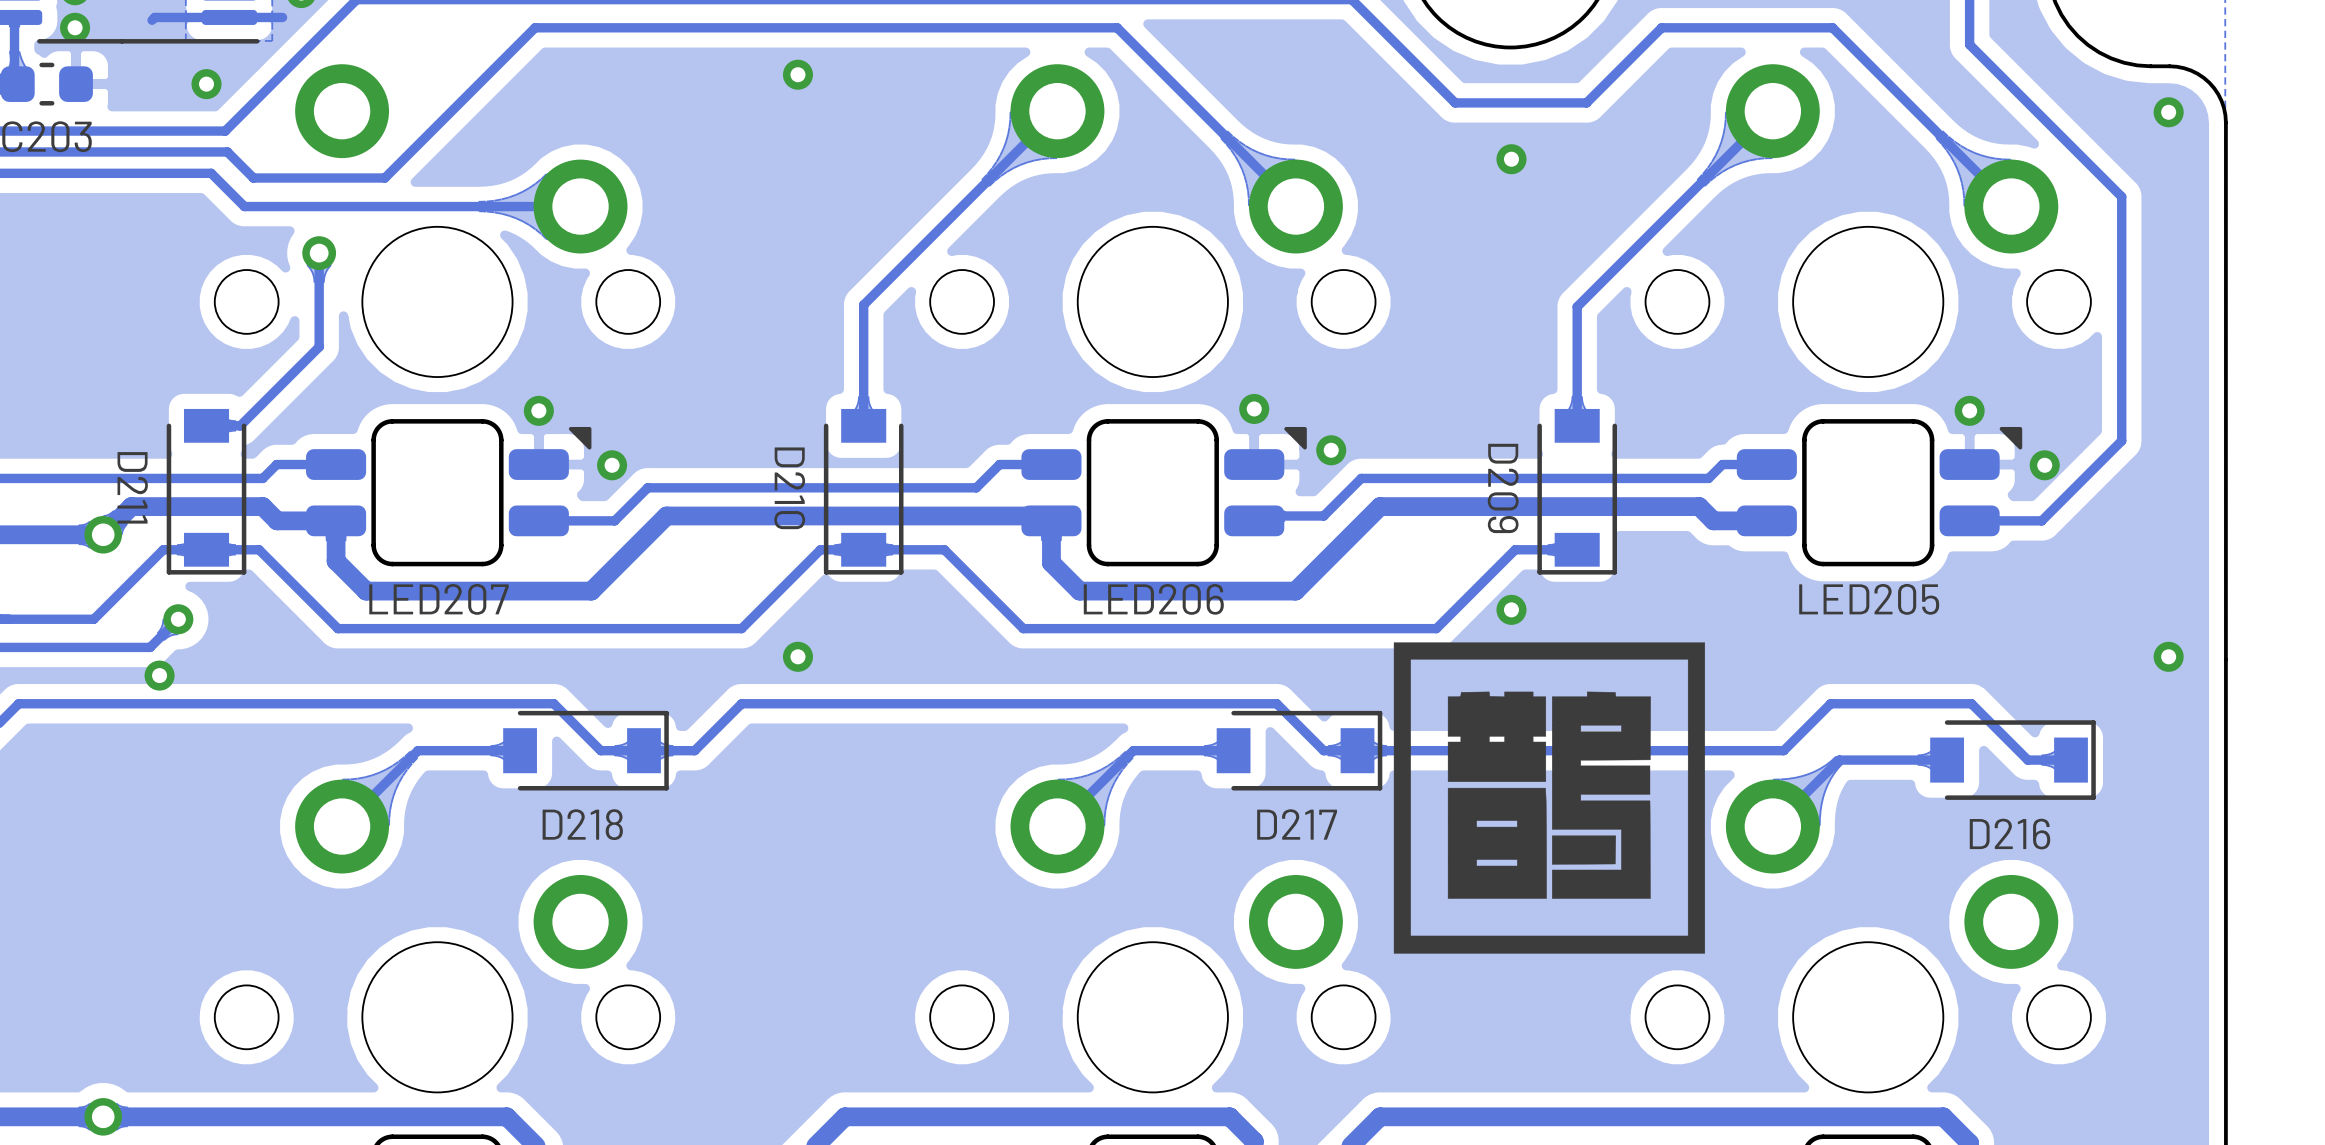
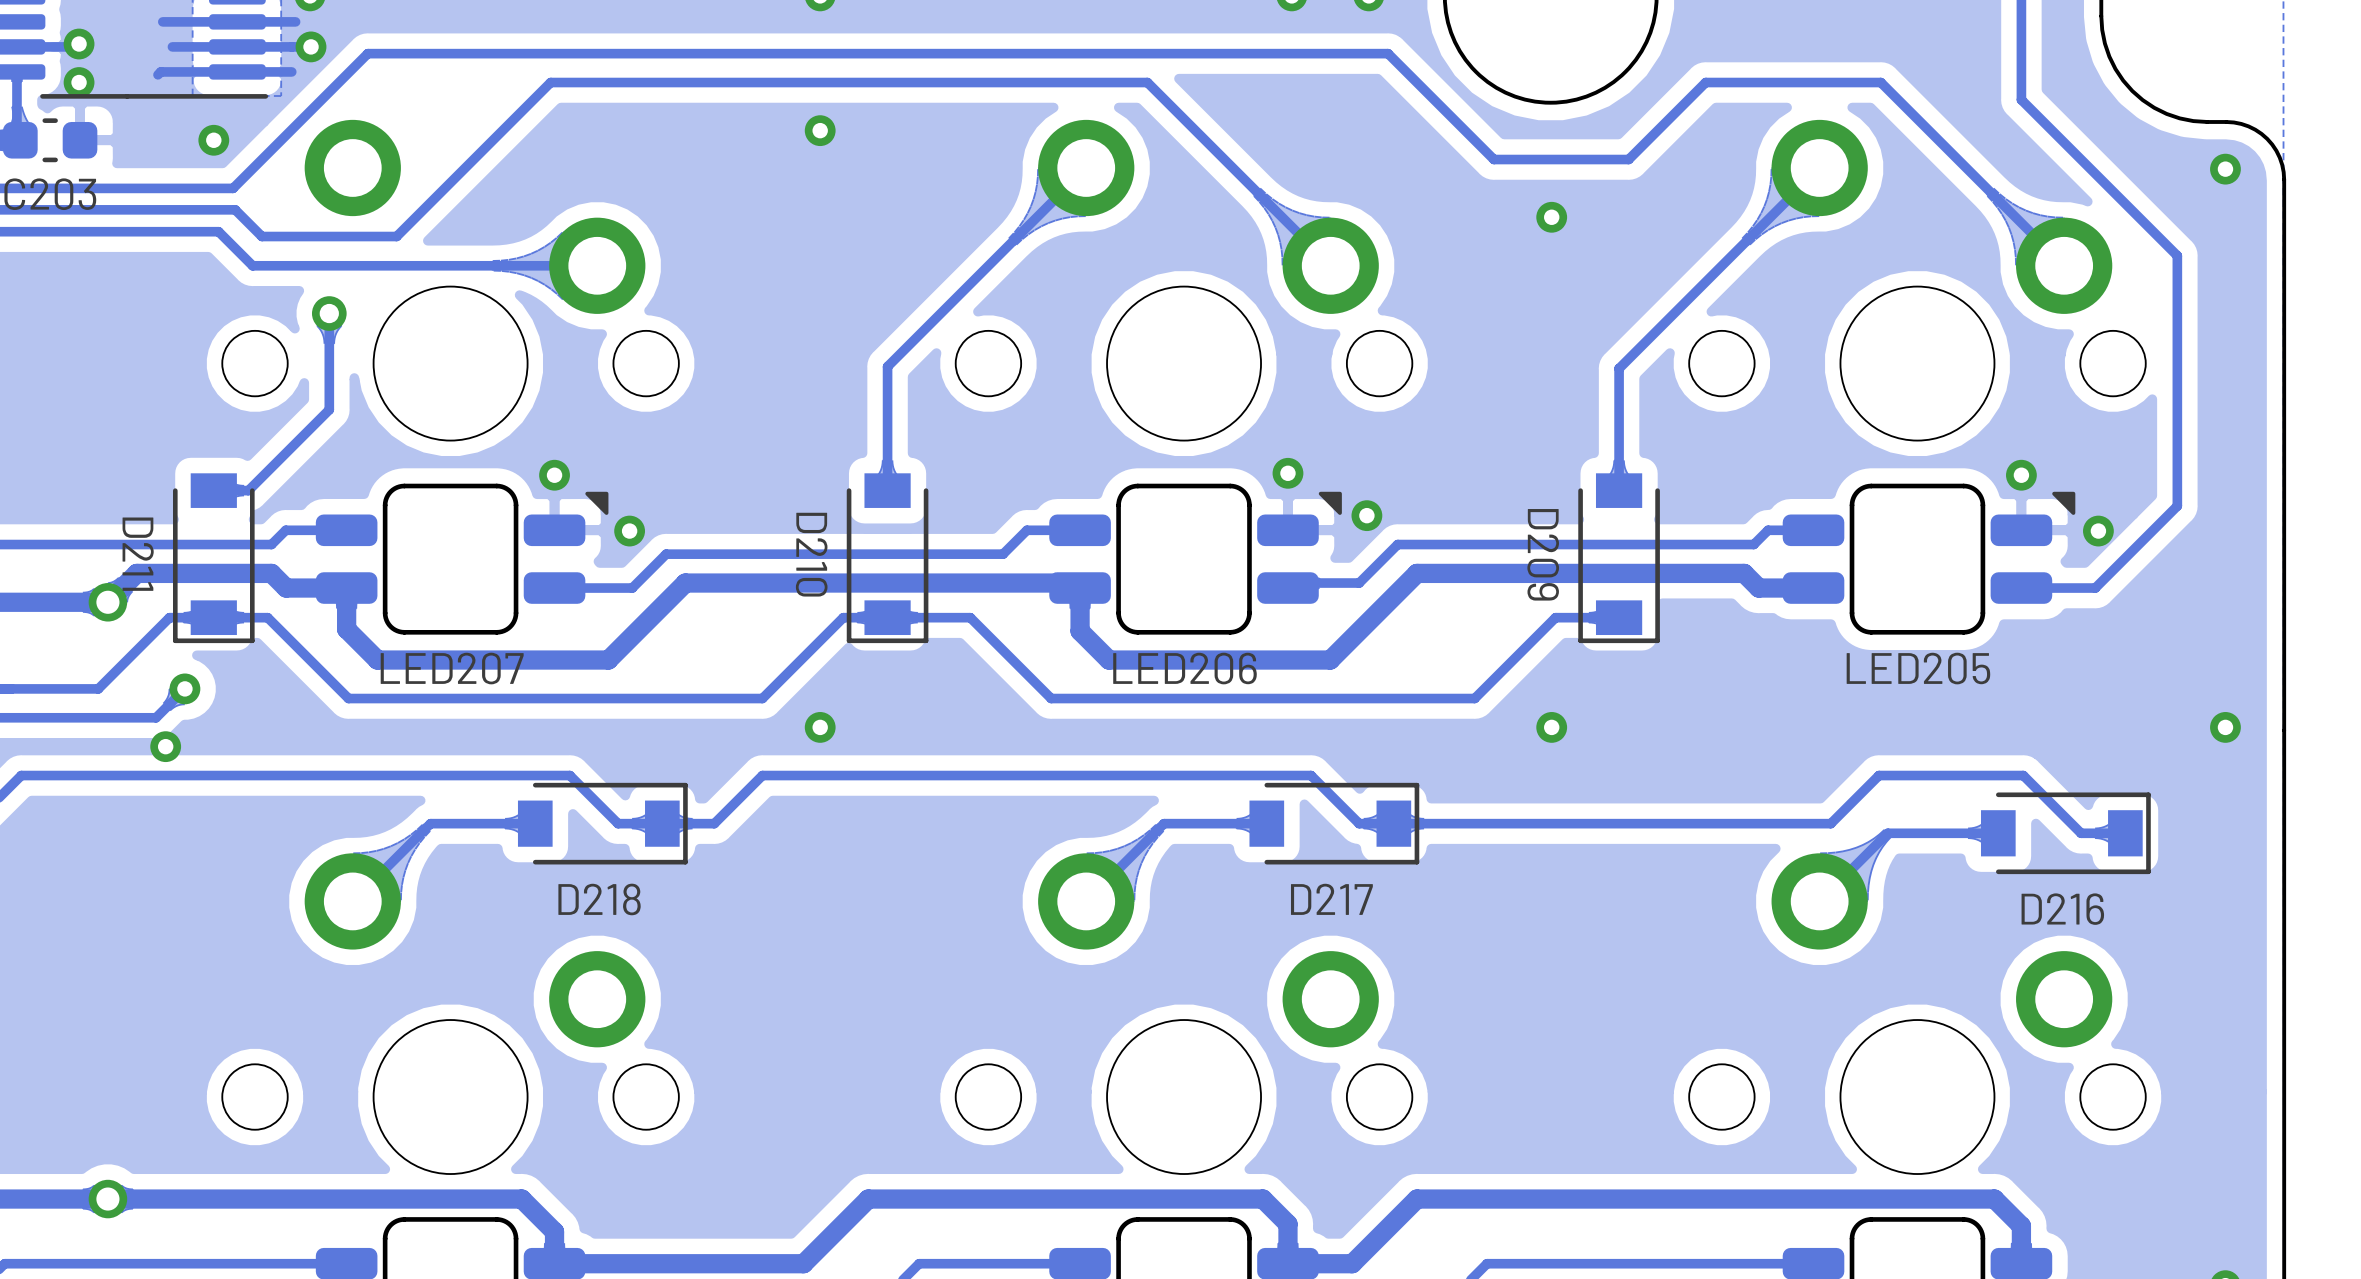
via position: (1511, 609) -> (1551, 727)
drawing: [1393, 642, 1706, 954] -> none

